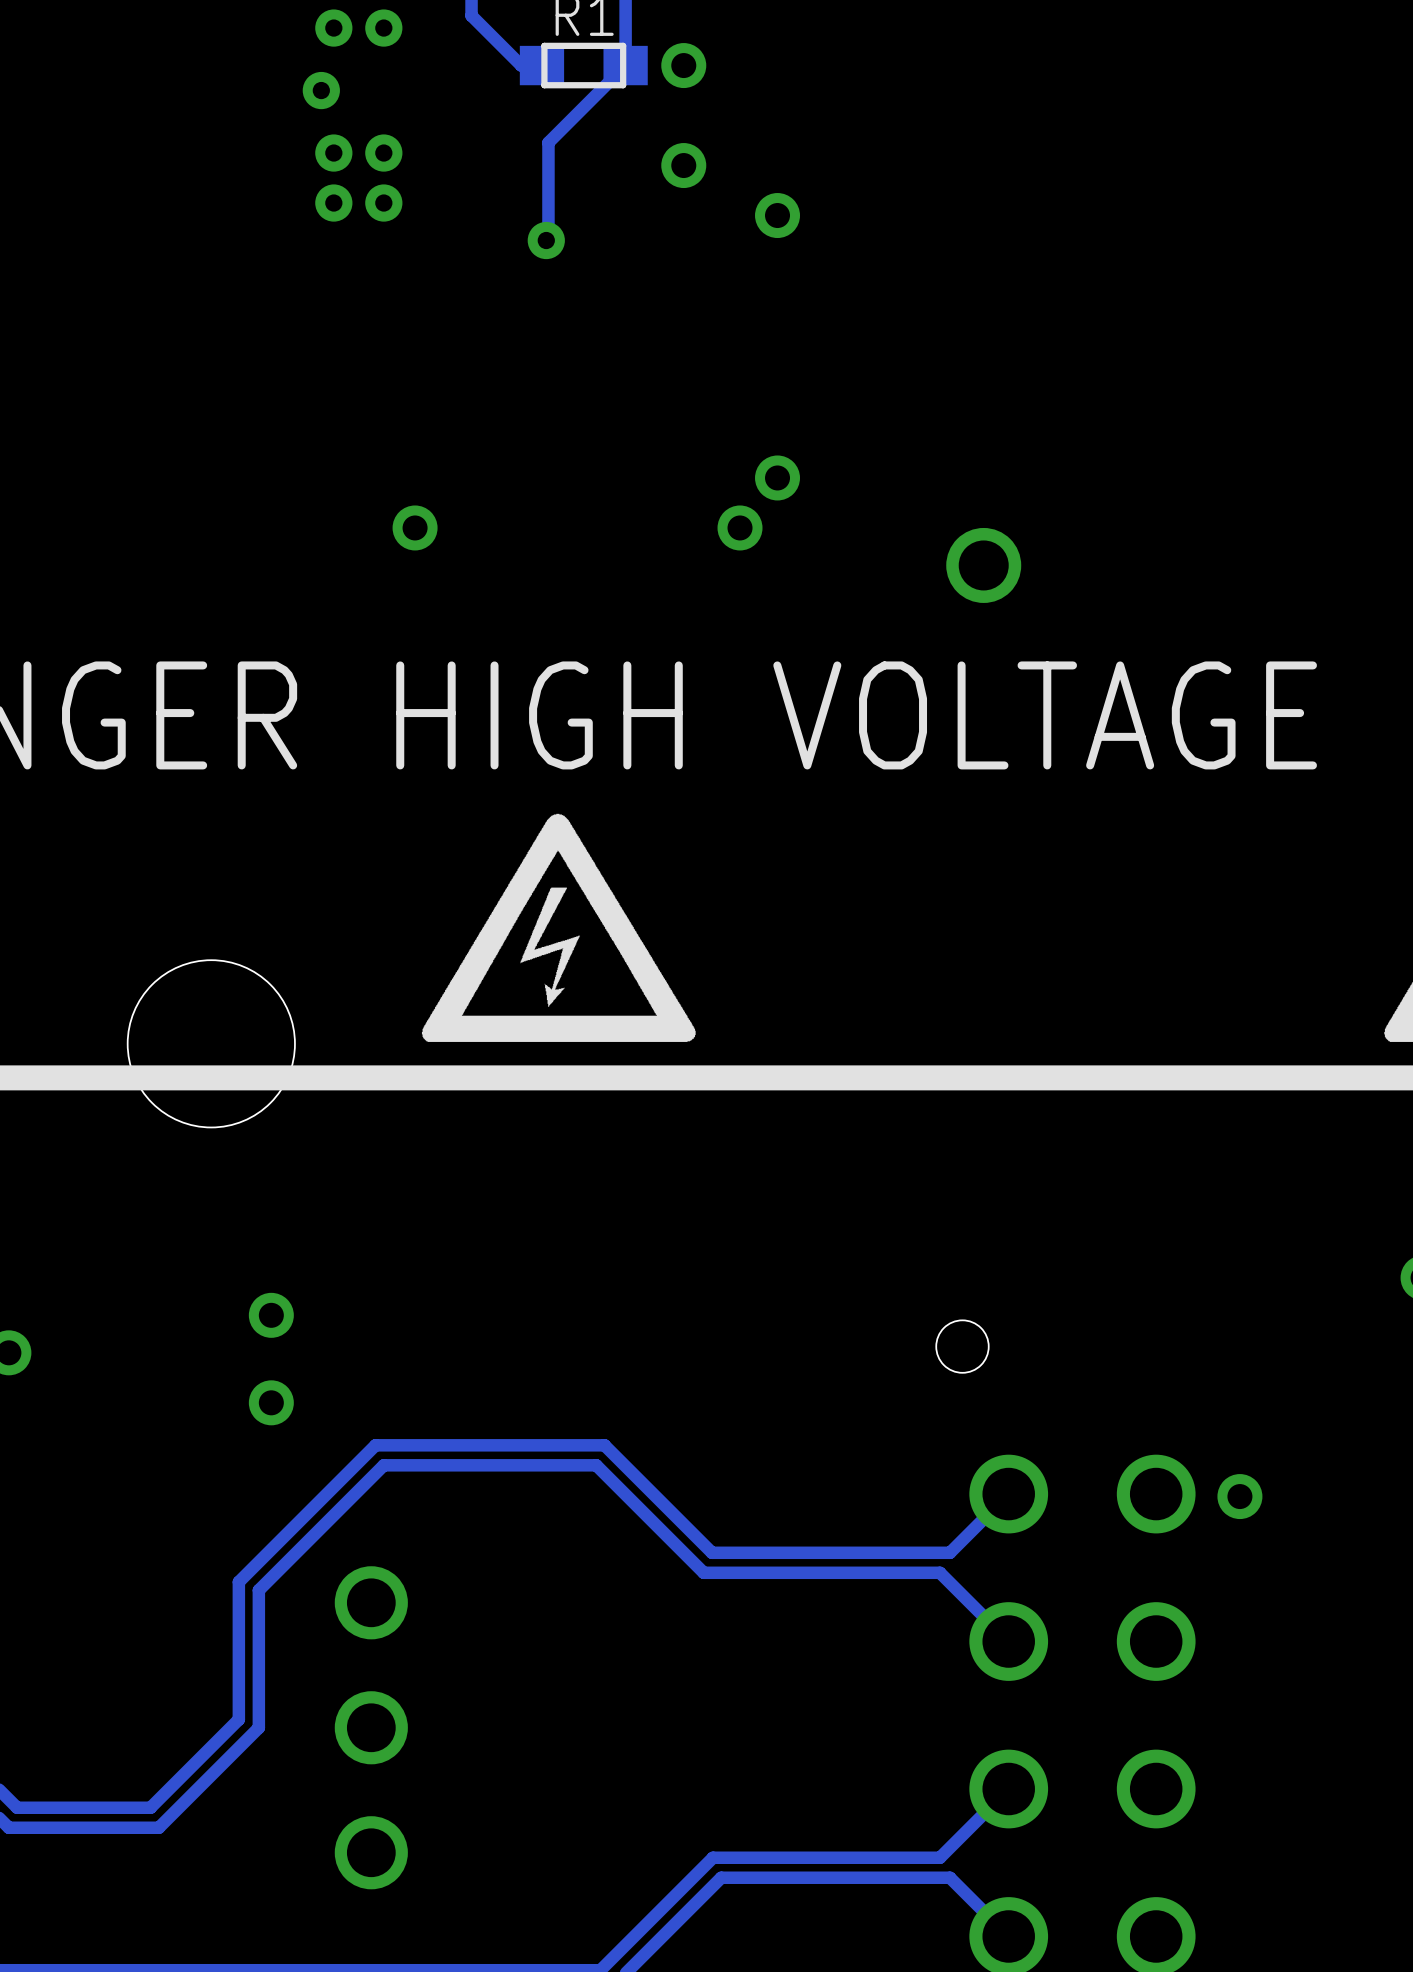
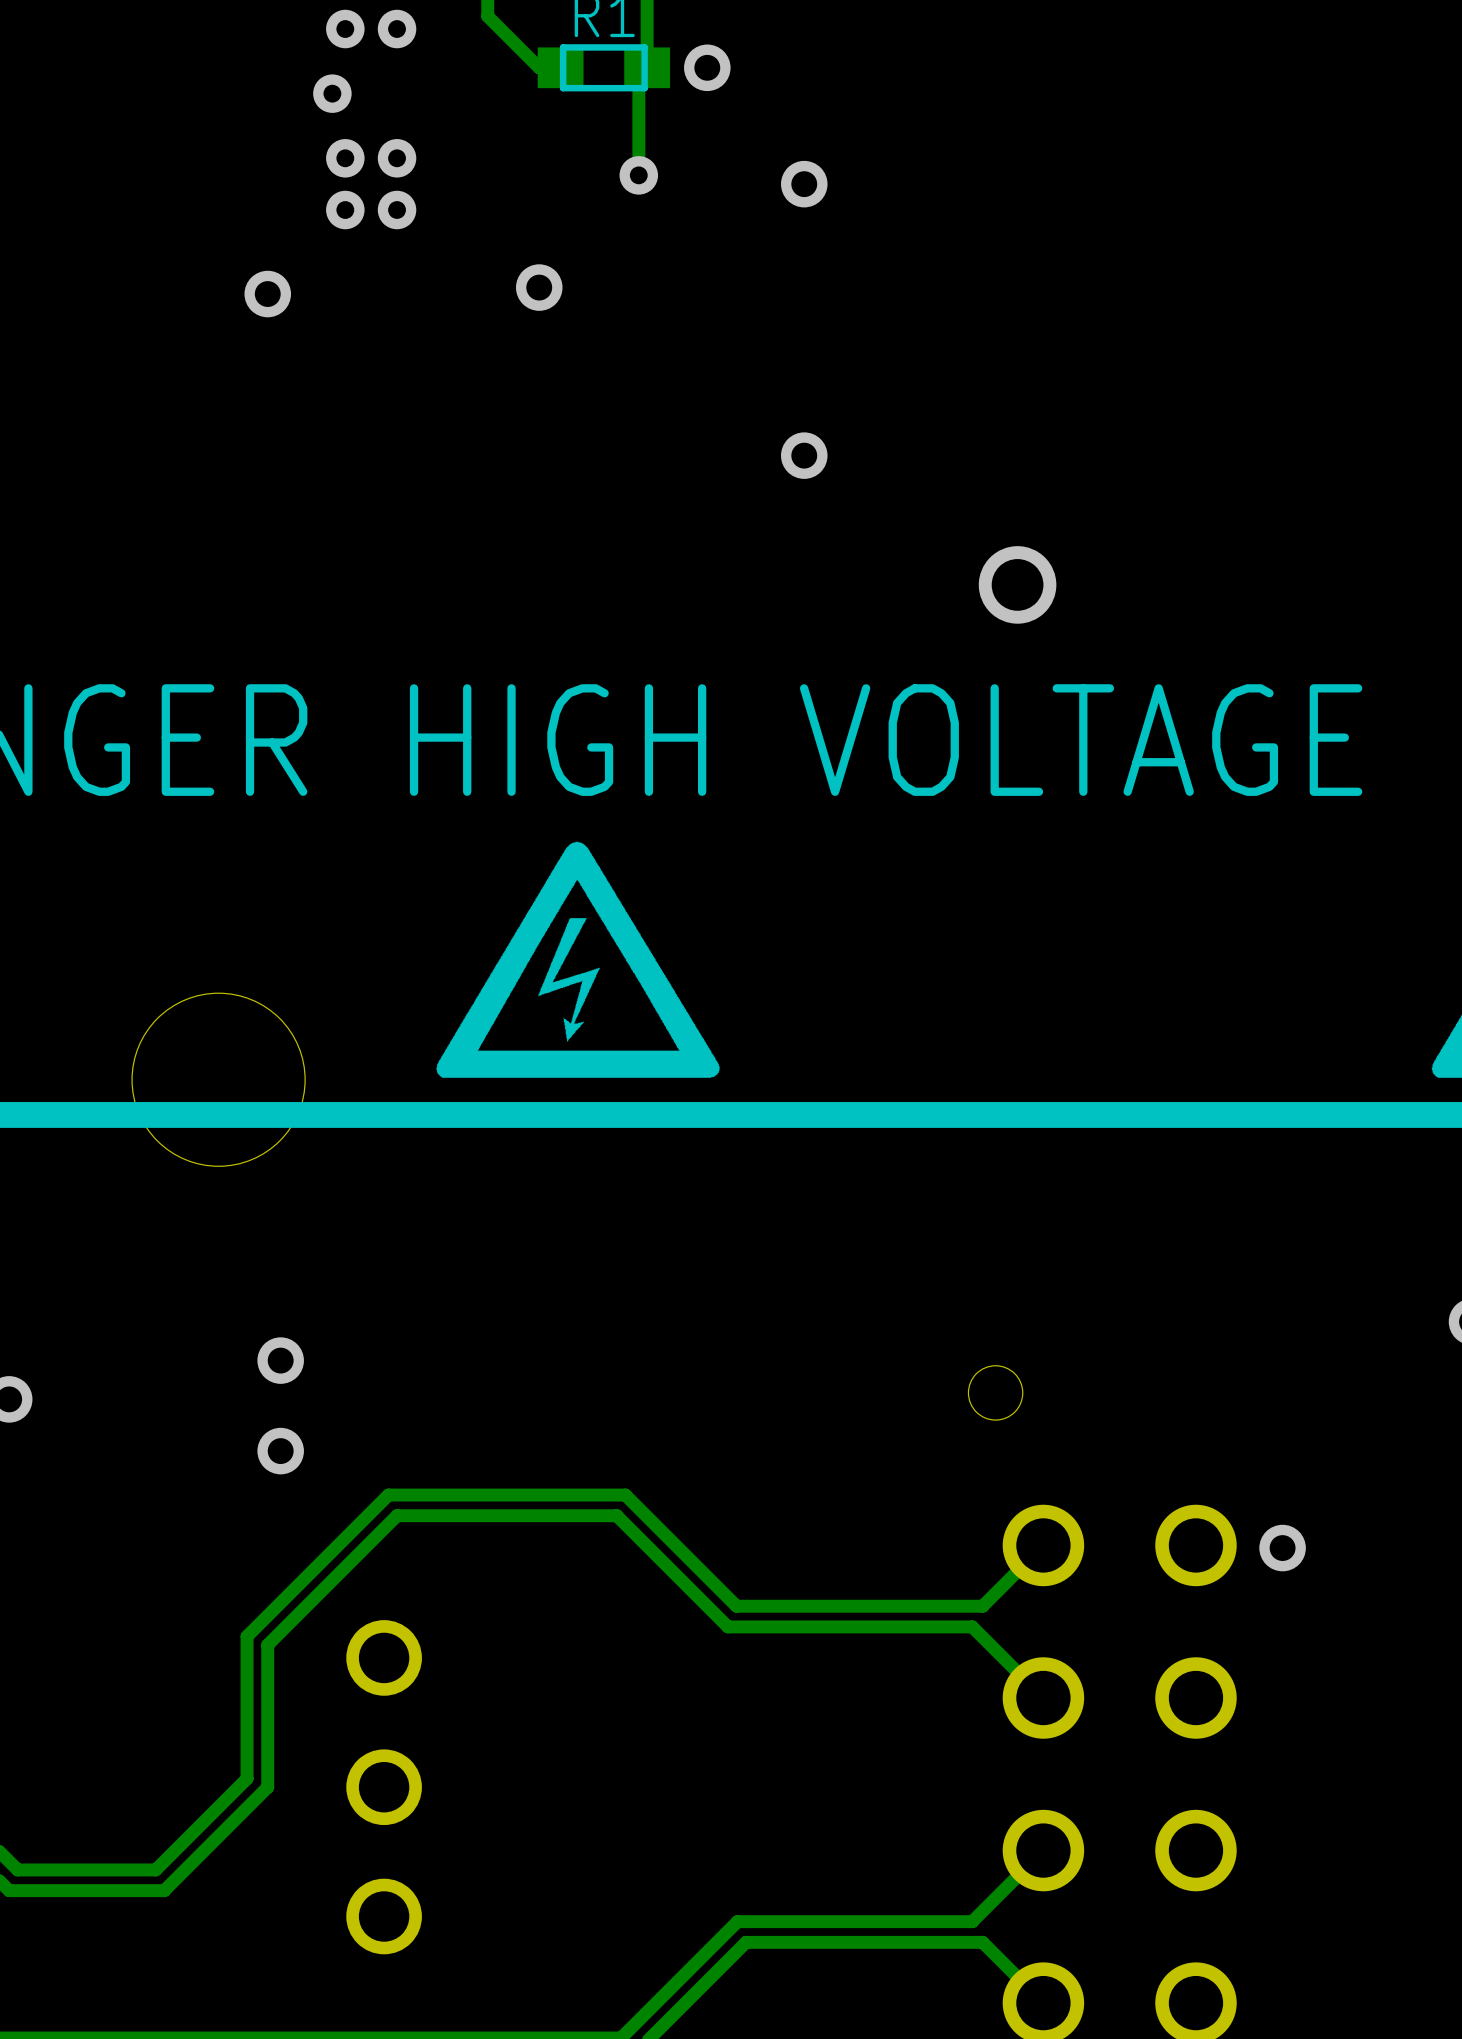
track: (617, 73) (548, 142) (548, 238) (546, 240) -> (638, 76) (638, 175)
via: (683, 165) -> none
via position: (777, 215) -> (804, 184)
via position: (546, 240) -> (638, 175)
via: none -> (539, 287)
via: none -> (267, 294)
via position: (777, 477) -> (804, 455)
via: (415, 527) -> none
via: (740, 527) -> none

